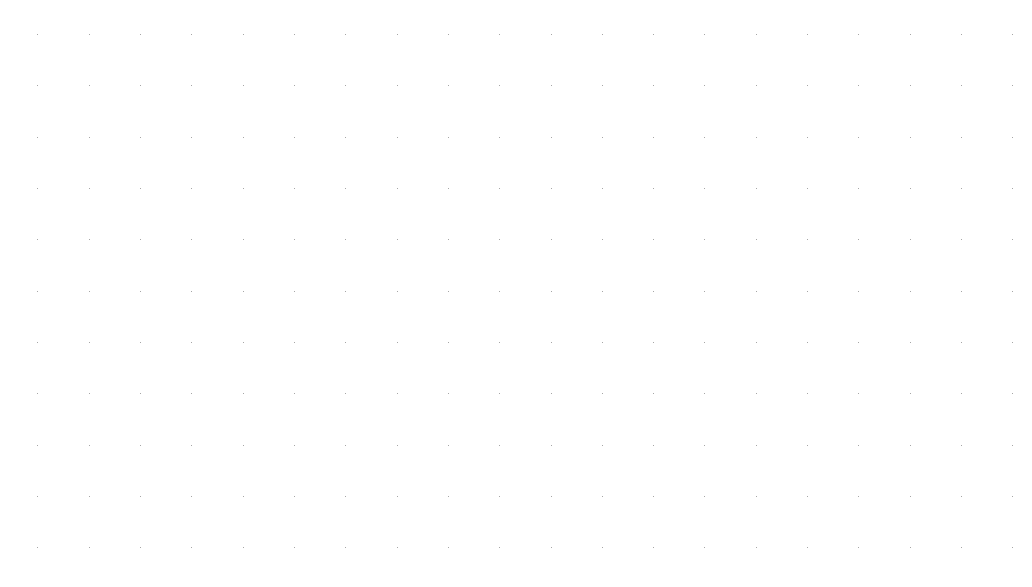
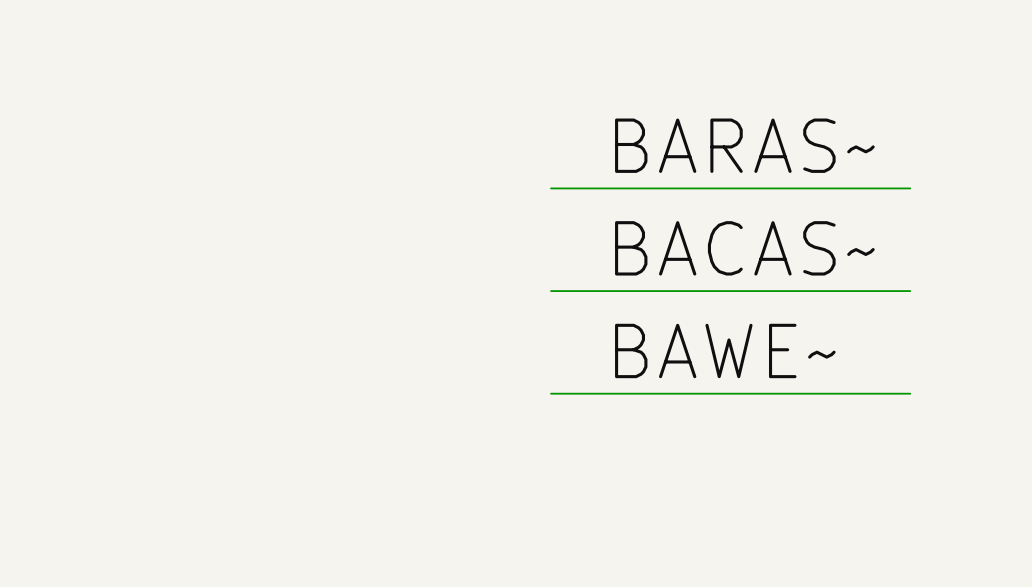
label: none -> BARAS~ (744, 145)
wire: none -> (551, 188) (910, 188)
label: none -> BACAS~ (744, 248)
wire: none -> (551, 291) (910, 291)
label: none -> BAWE~ (725, 350)
wire: none -> (551, 393) (910, 393)

